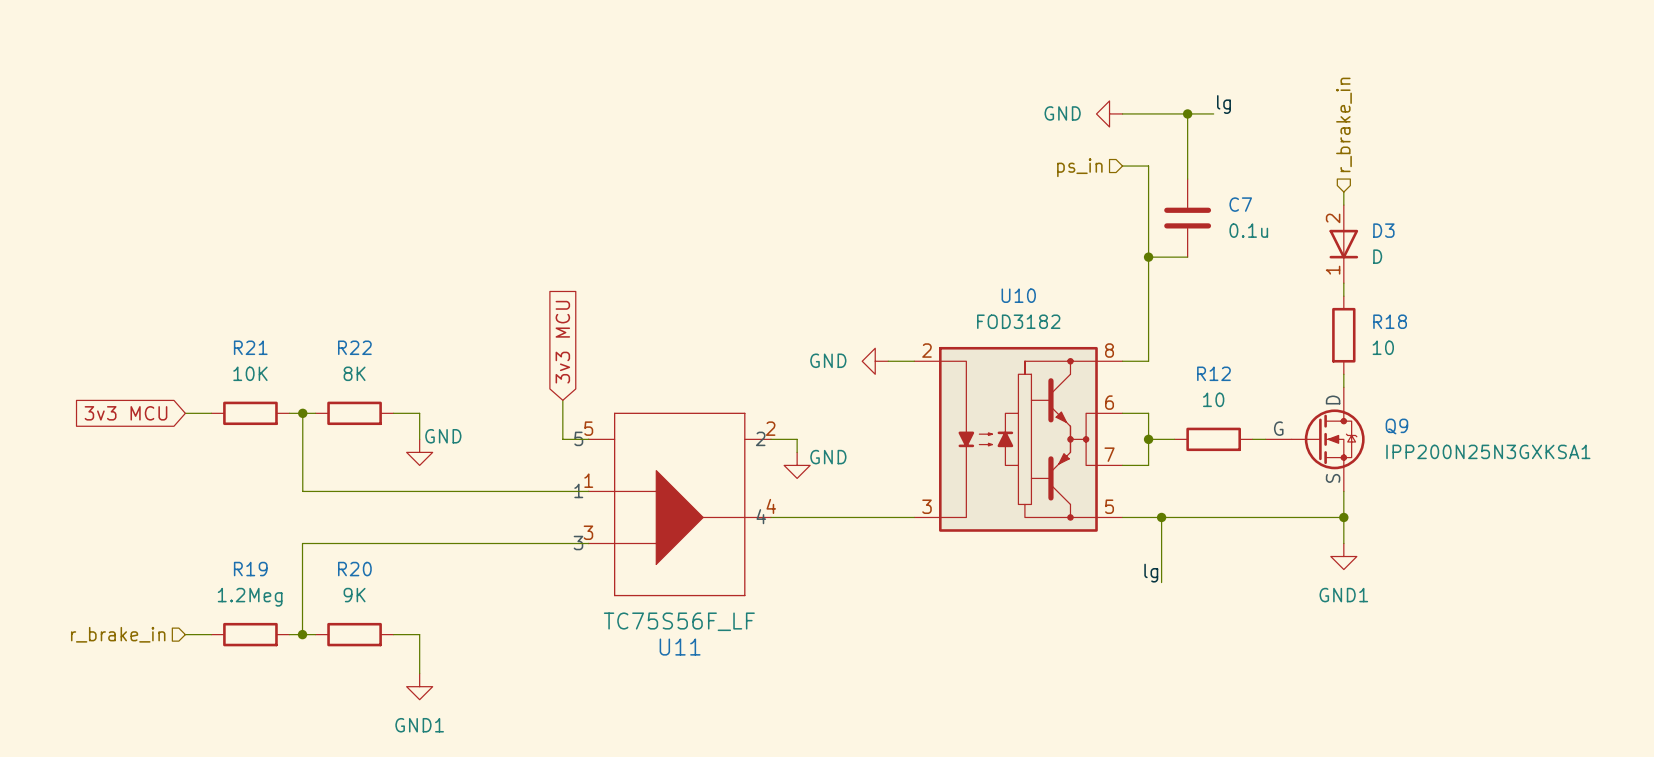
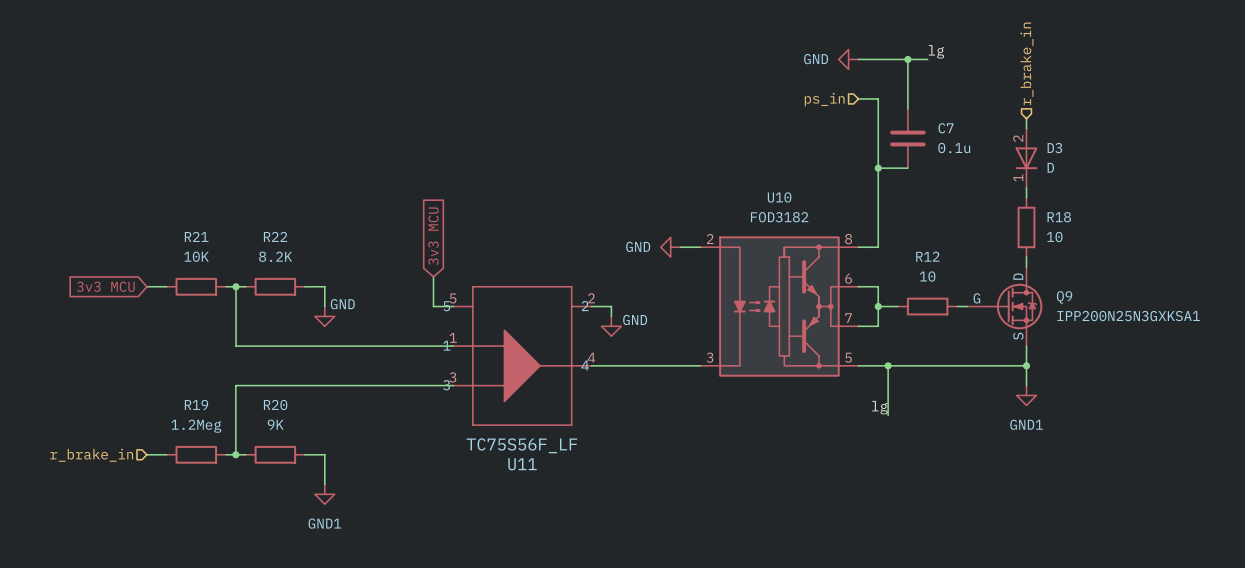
R22 value: 8K (354, 373) -> 8.2K (275, 256)

